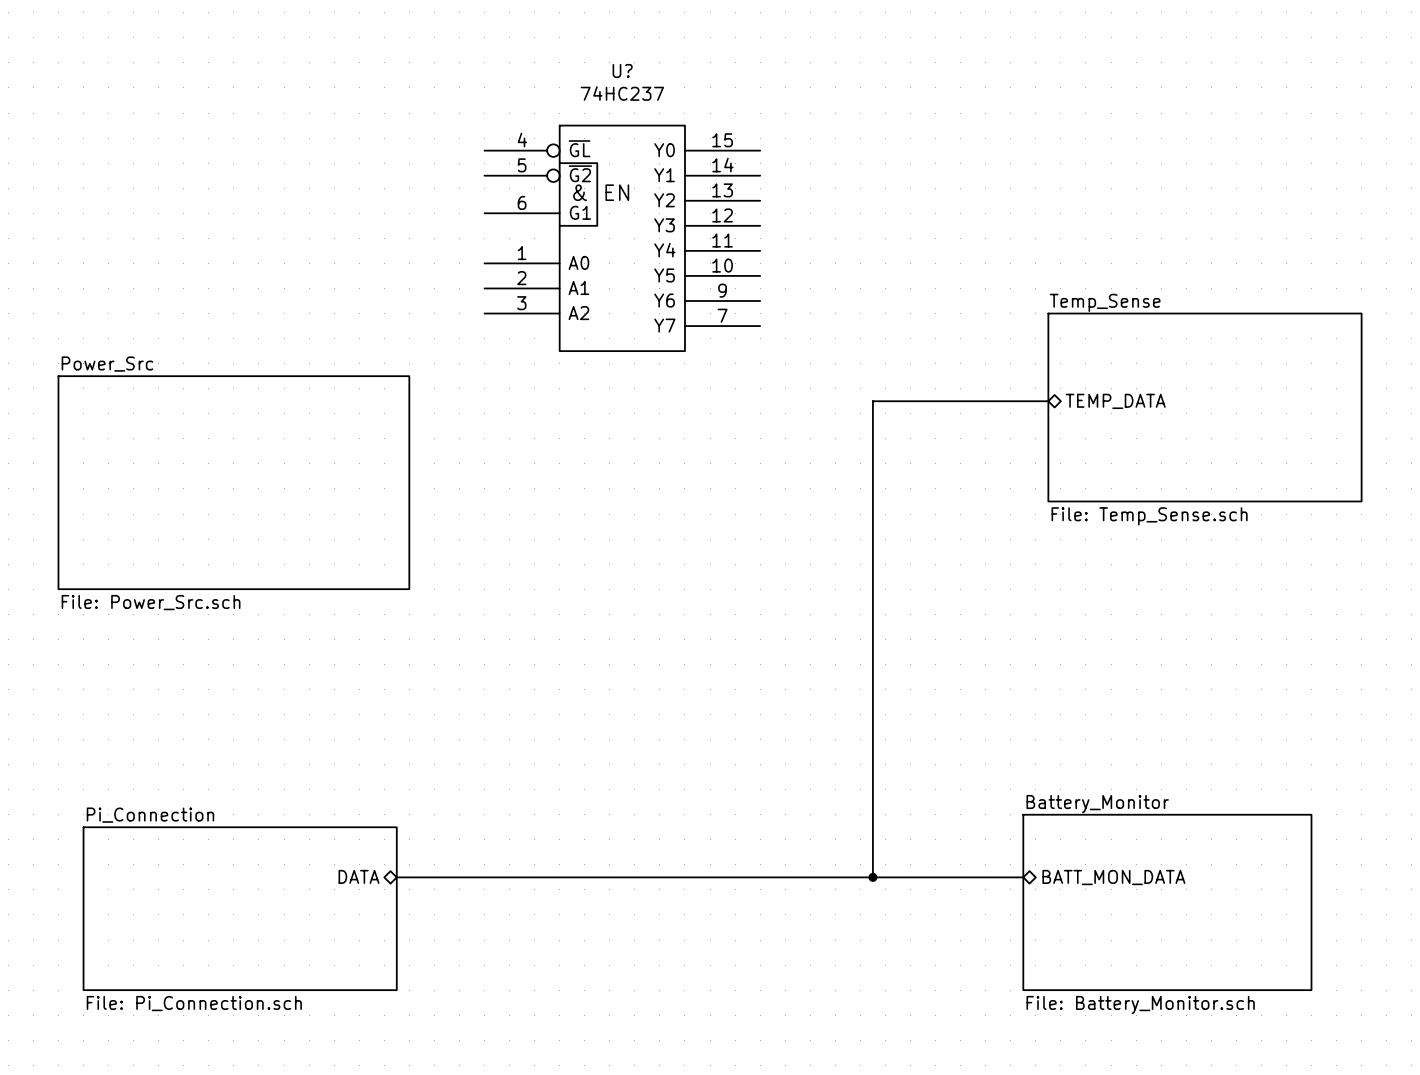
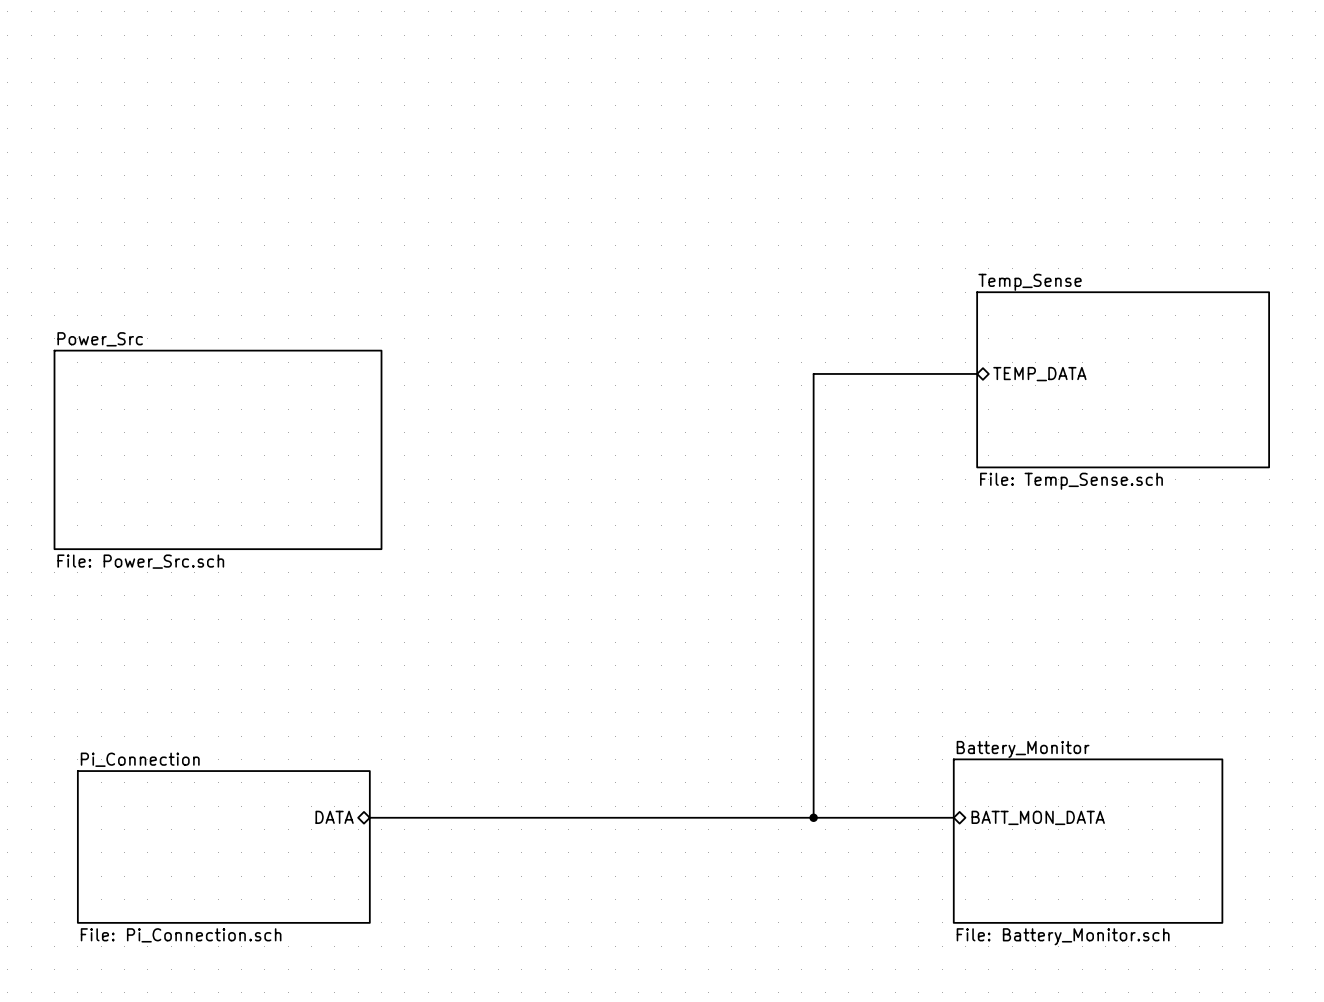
U?: 74HC237 (622, 238) -> none

